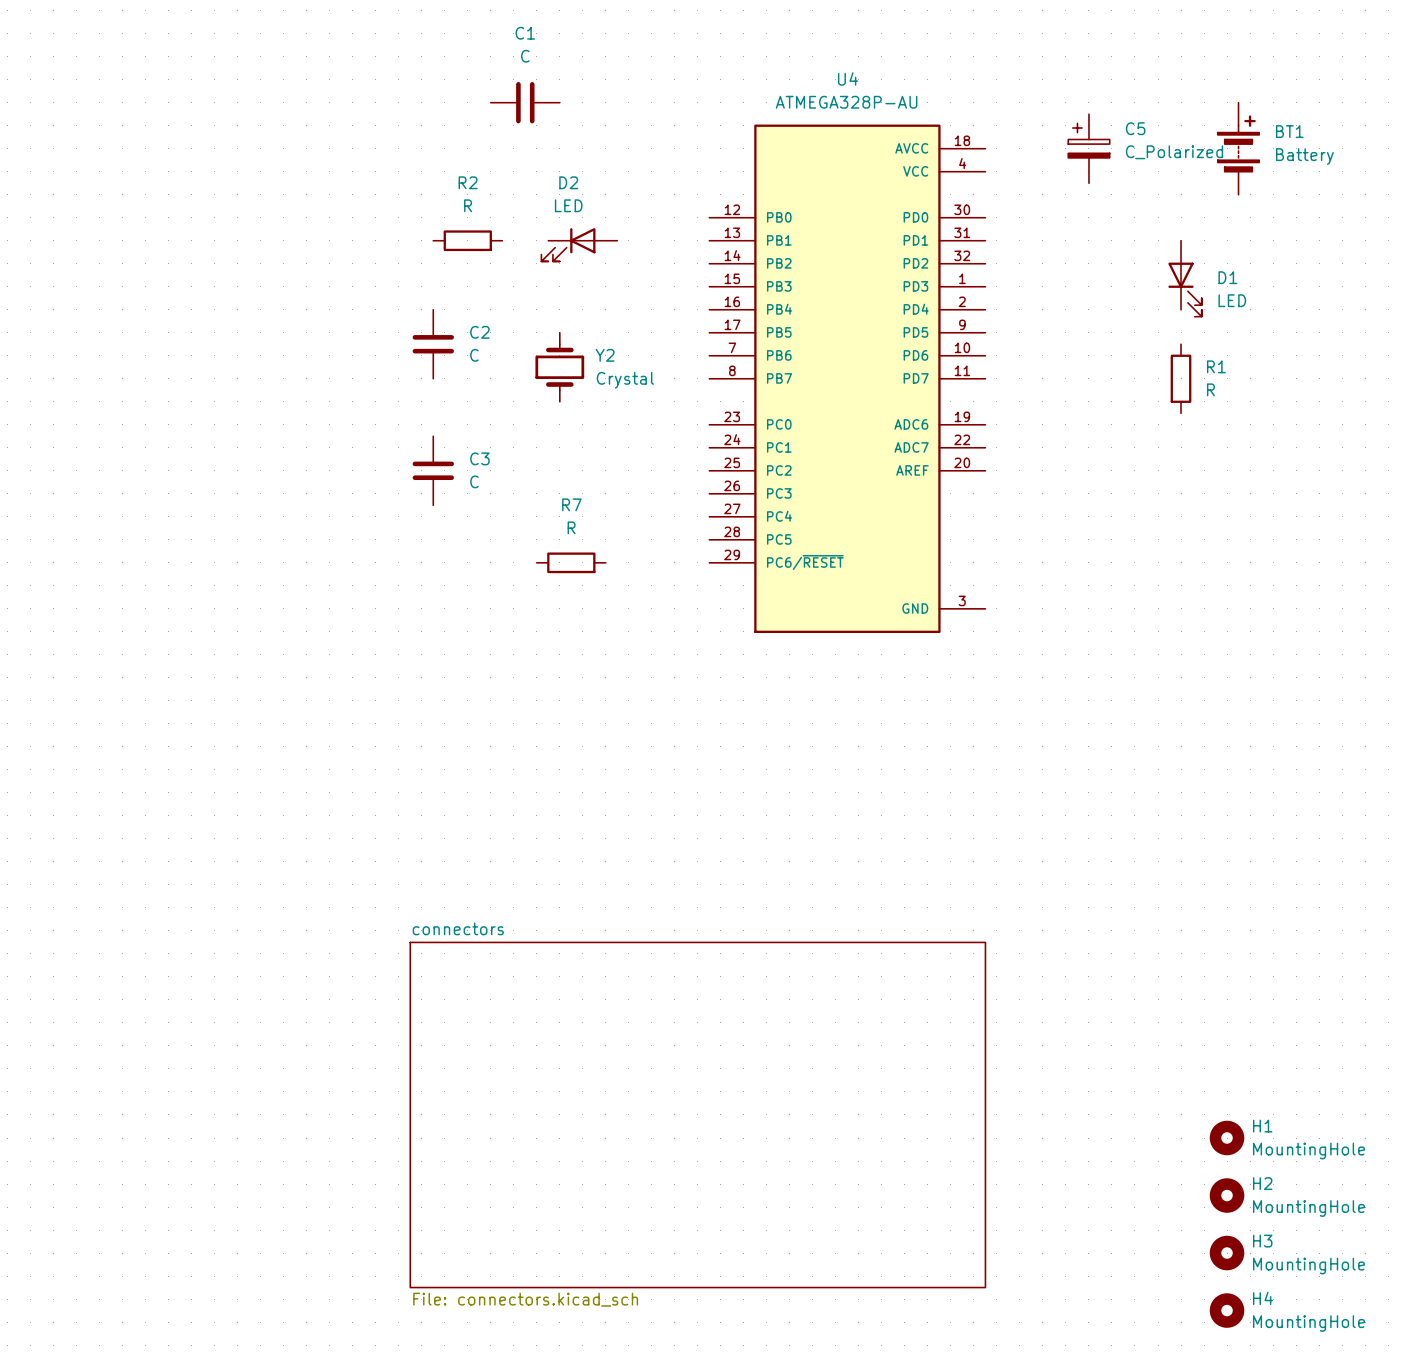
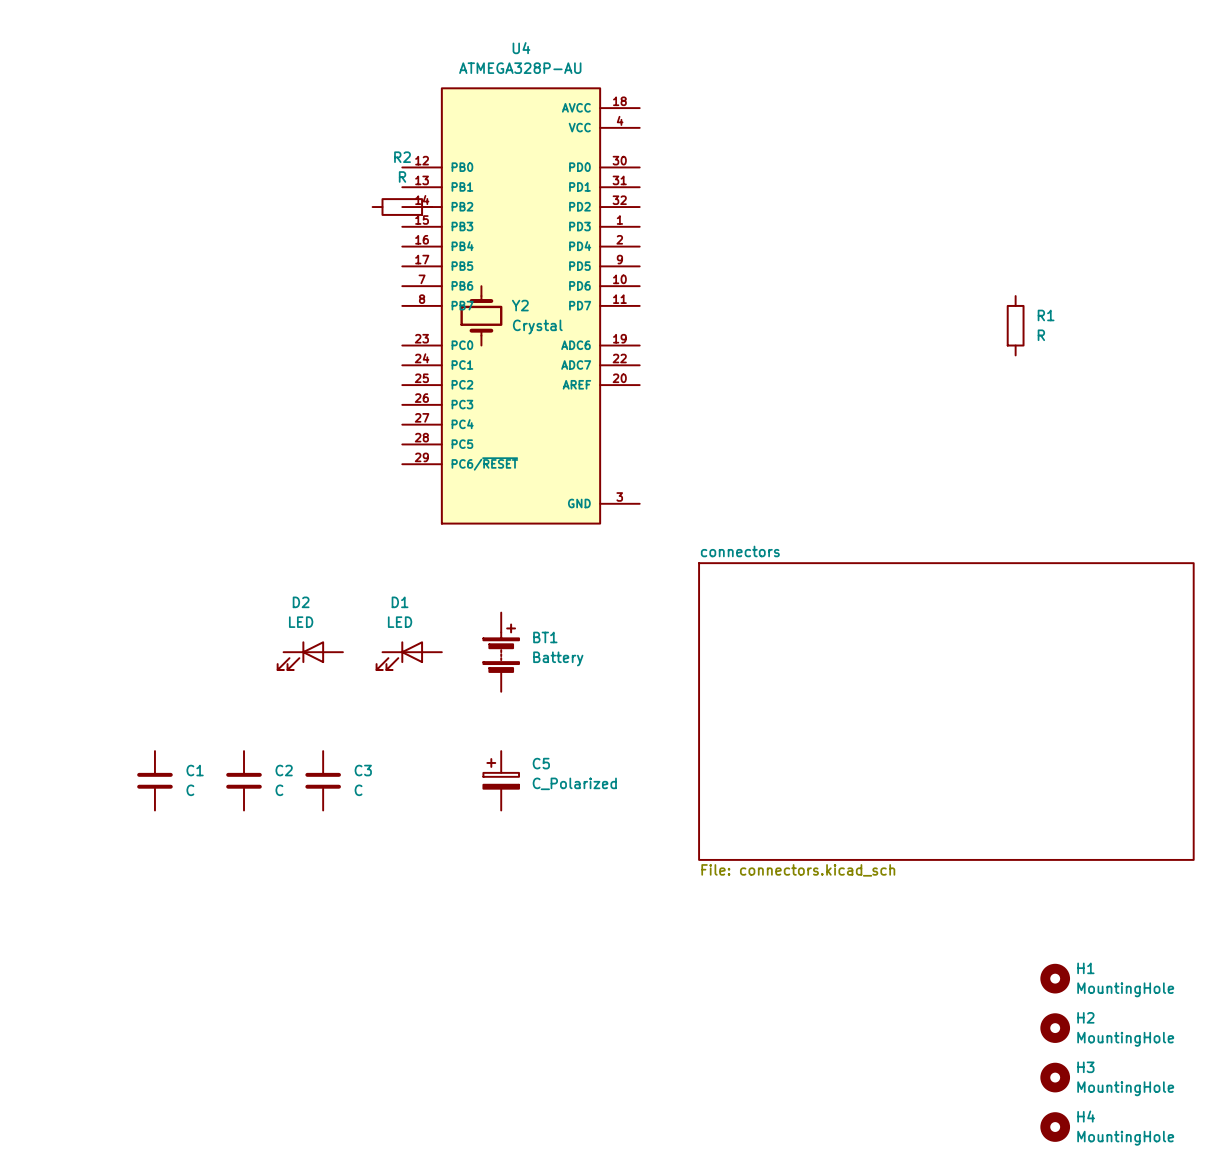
C1 name position: C1 (525, 33) -> C1 (195, 770)
C1 rotation: 0° (525, 102) -> 90° clockwise (154, 780)
C1 position: (525, 102) -> (154, 780)
C5 position: (1088, 148) -> (501, 780)
BT1 position: (1238, 148) -> (501, 652)
D2 position: (579, 244) -> (310, 655)
D1 name position: D1 (1227, 277) -> D1 (400, 602)
D1 position: (1185, 278) -> (409, 655)
D1 rotation: 0° (1185, 289) -> 90° clockwise (399, 655)
D1 value position: LED (1232, 300) -> LED (400, 622)
C2 position: (433, 344) -> (244, 780)
U4 position: (847, 378) -> (520, 305)
C3 position: (433, 470) -> (323, 780)
R7: R (571, 562) -> none
sheet connectors: none -> File: connectors.kicad_sch (946, 711)
sheet connectors: File: connectors.kicad_sch (697, 1114) -> none

